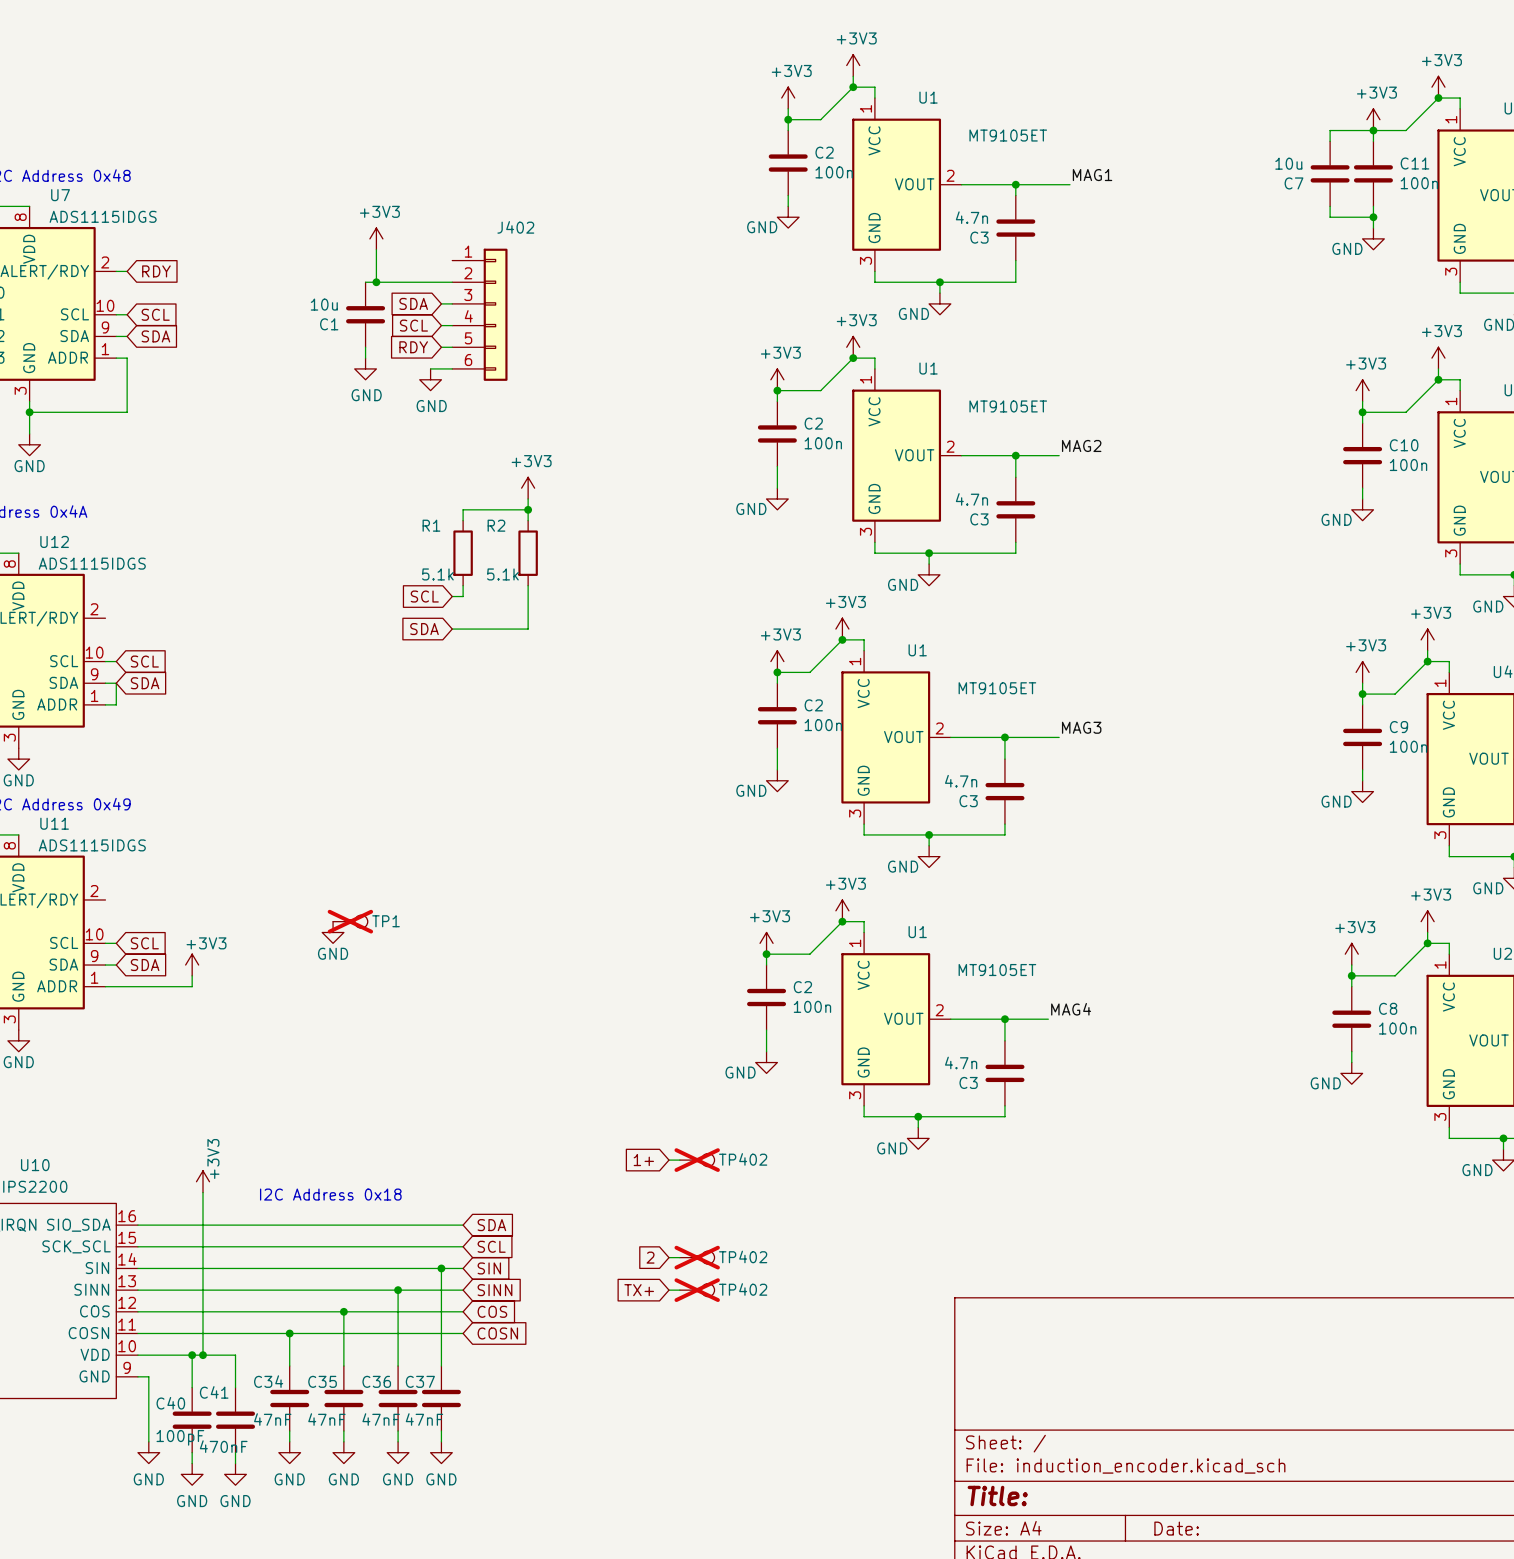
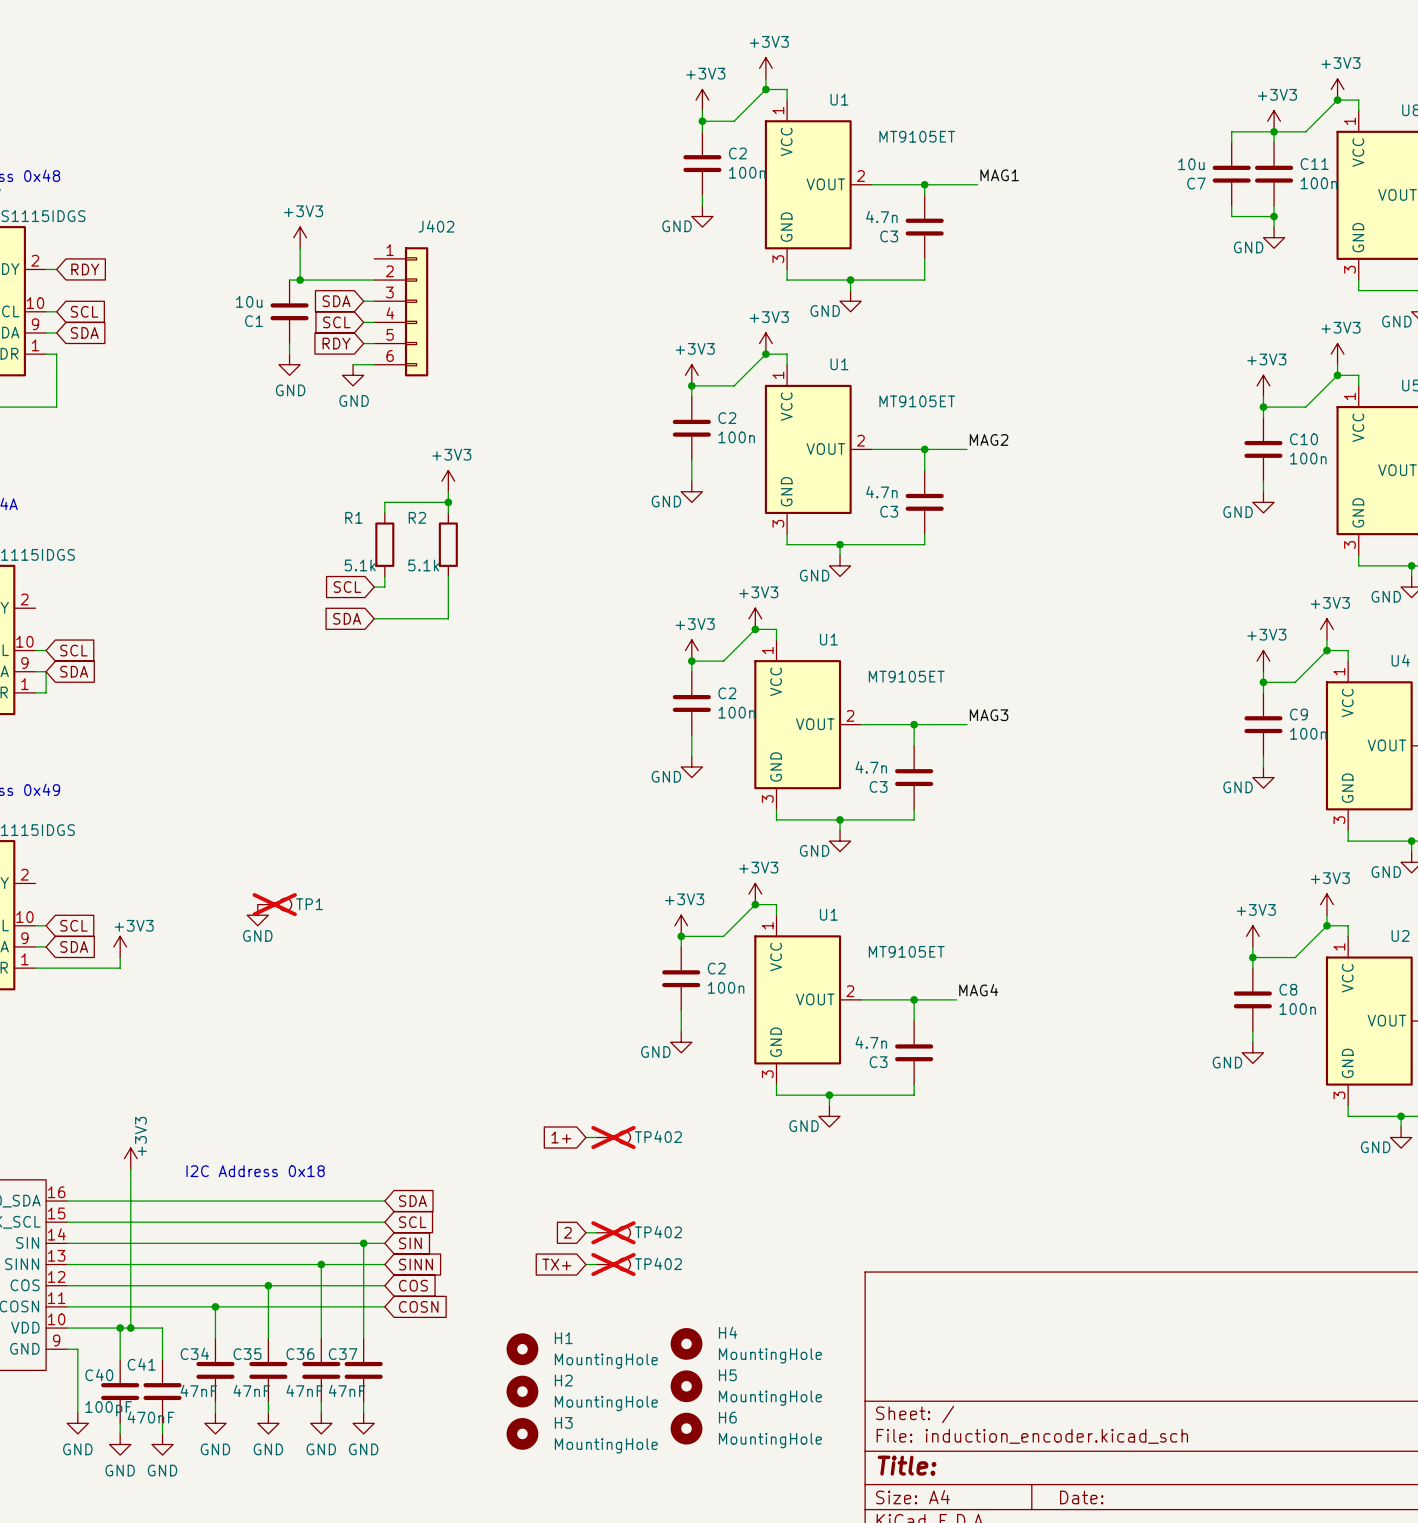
H4: none -> MountingHole (686, 1343)
H1: none -> MountingHole (522, 1349)
H5: none -> MountingHole (686, 1386)
H2: none -> MountingHole (522, 1391)
H6: none -> MountingHole (686, 1428)
H3: none -> MountingHole (522, 1433)

